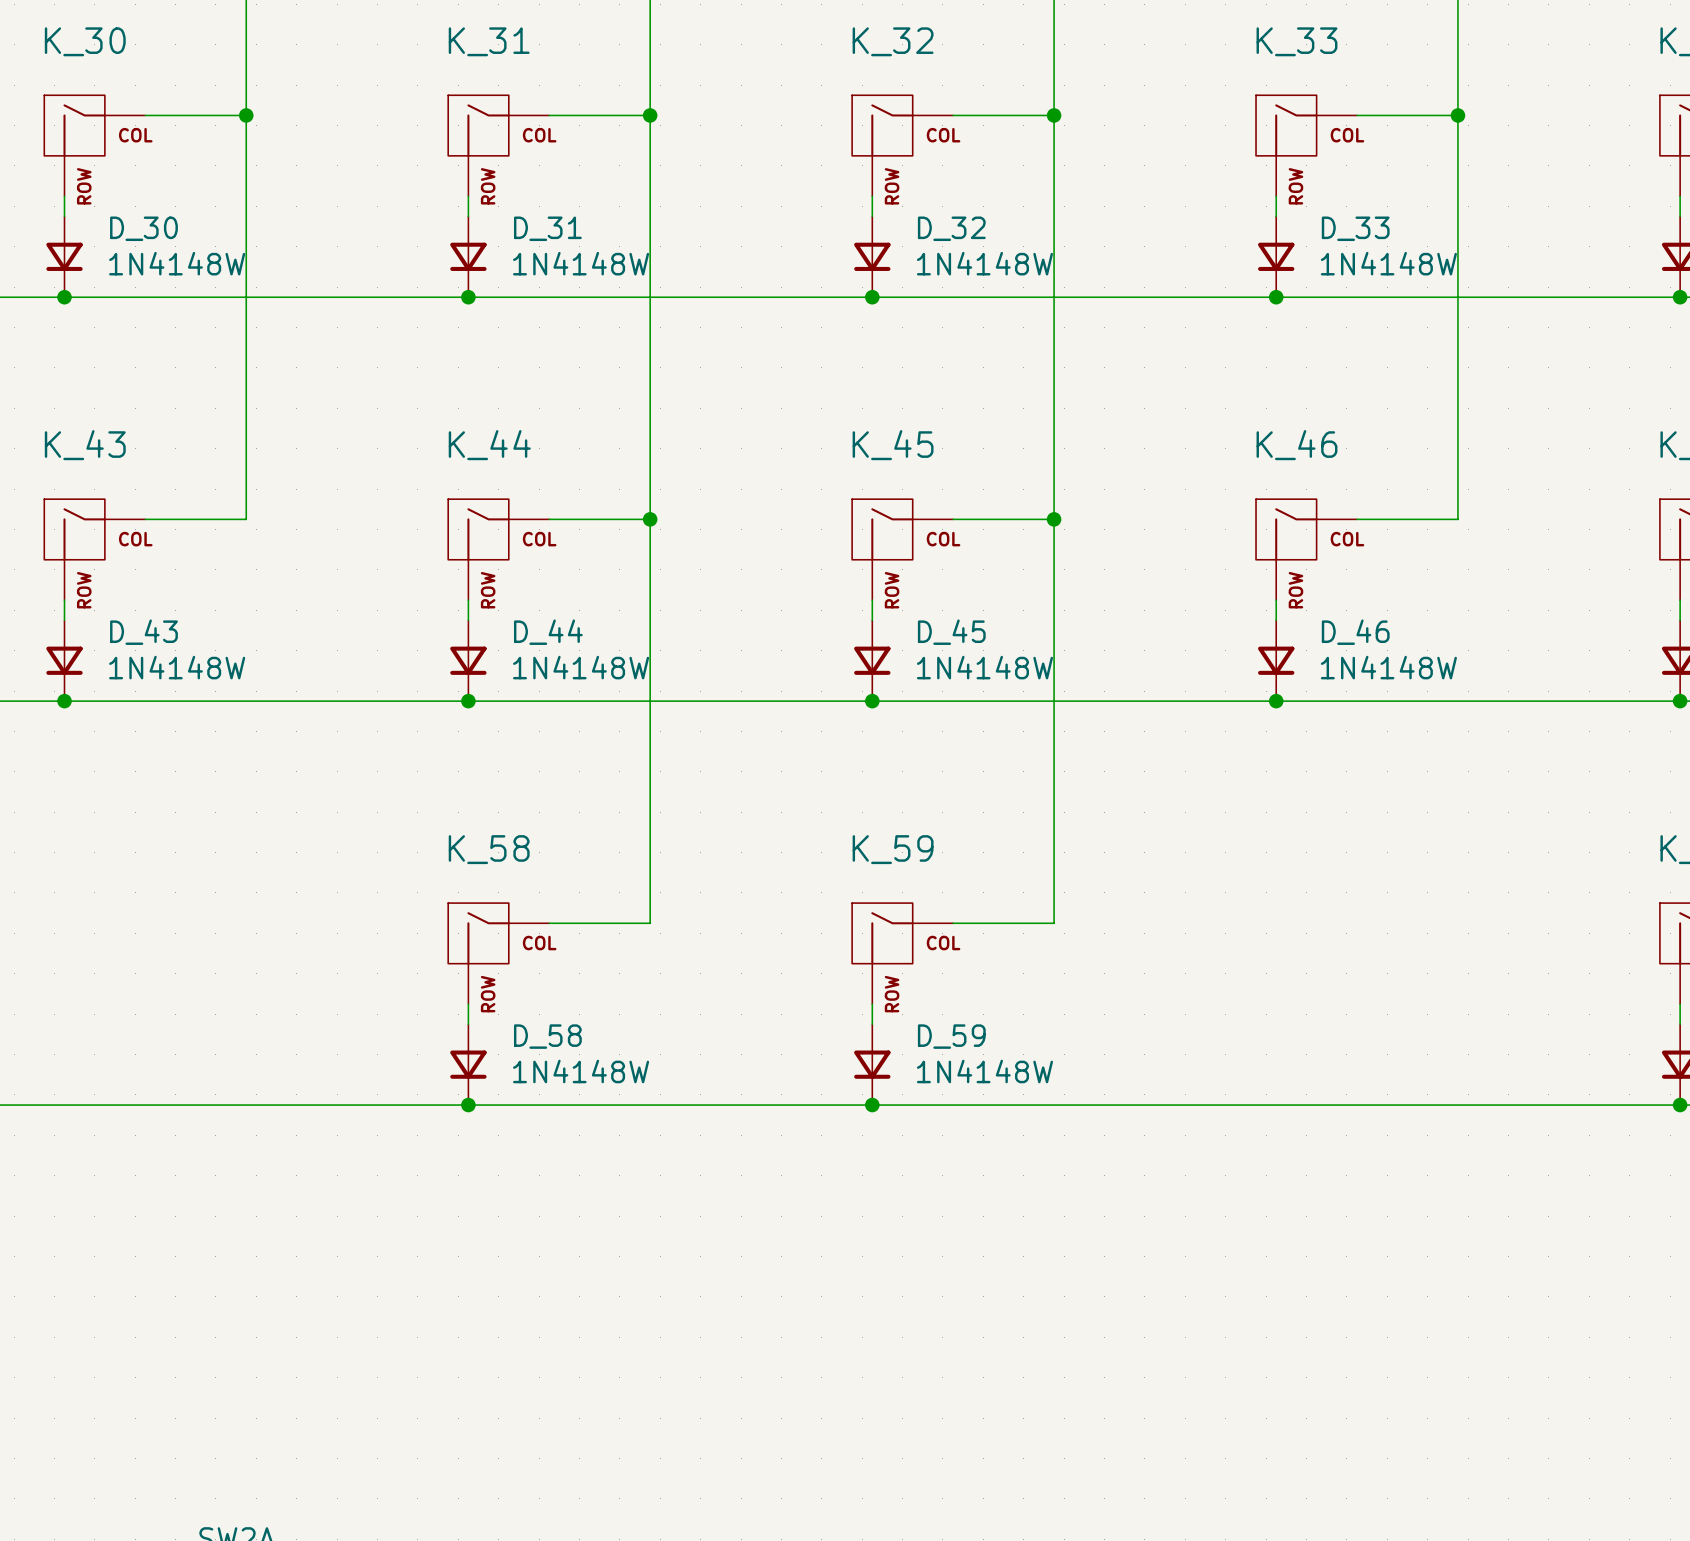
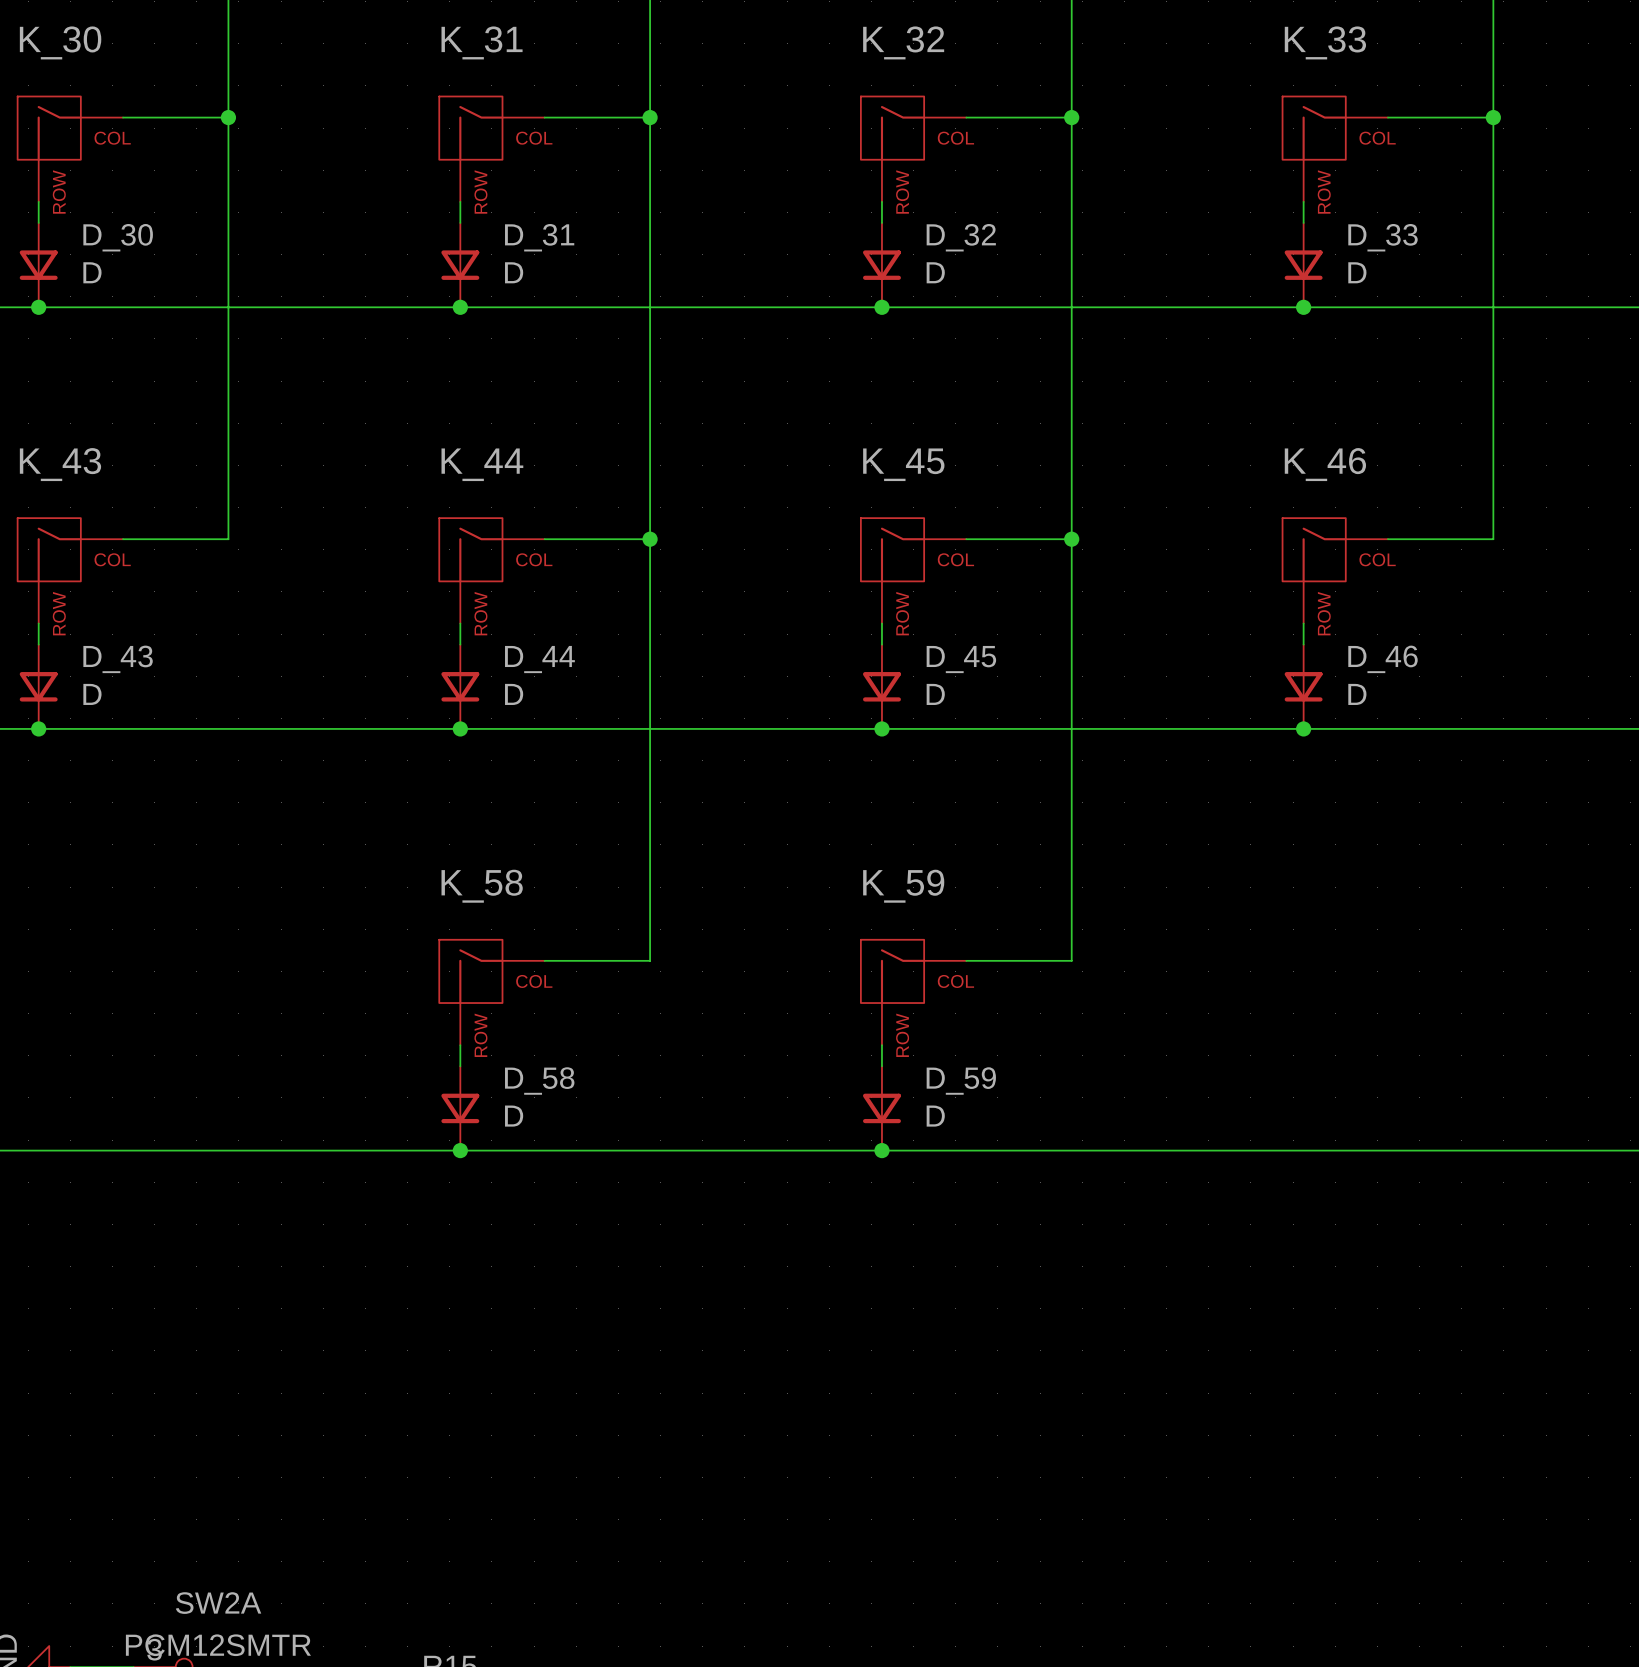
D_30 value: 1N4148W (177, 263) -> D (92, 272)
D_31 value: 1N4148W (581, 263) -> D (514, 272)
D_32 value: 1N4148W (984, 263) -> D (935, 272)
D_33 value: 1N4148W (1388, 263) -> D (1357, 272)
D_43 value: 1N4148W (177, 667) -> D (92, 694)
D_44 value: 1N4148W (581, 667) -> D (514, 694)
D_45 value: 1N4148W (984, 667) -> D (935, 694)
D_46 value: 1N4148W (1388, 667) -> D (1357, 694)
D_58 value: 1N4148W (581, 1071) -> D (514, 1116)
D_59 value: 1N4148W (984, 1071) -> D (935, 1116)

